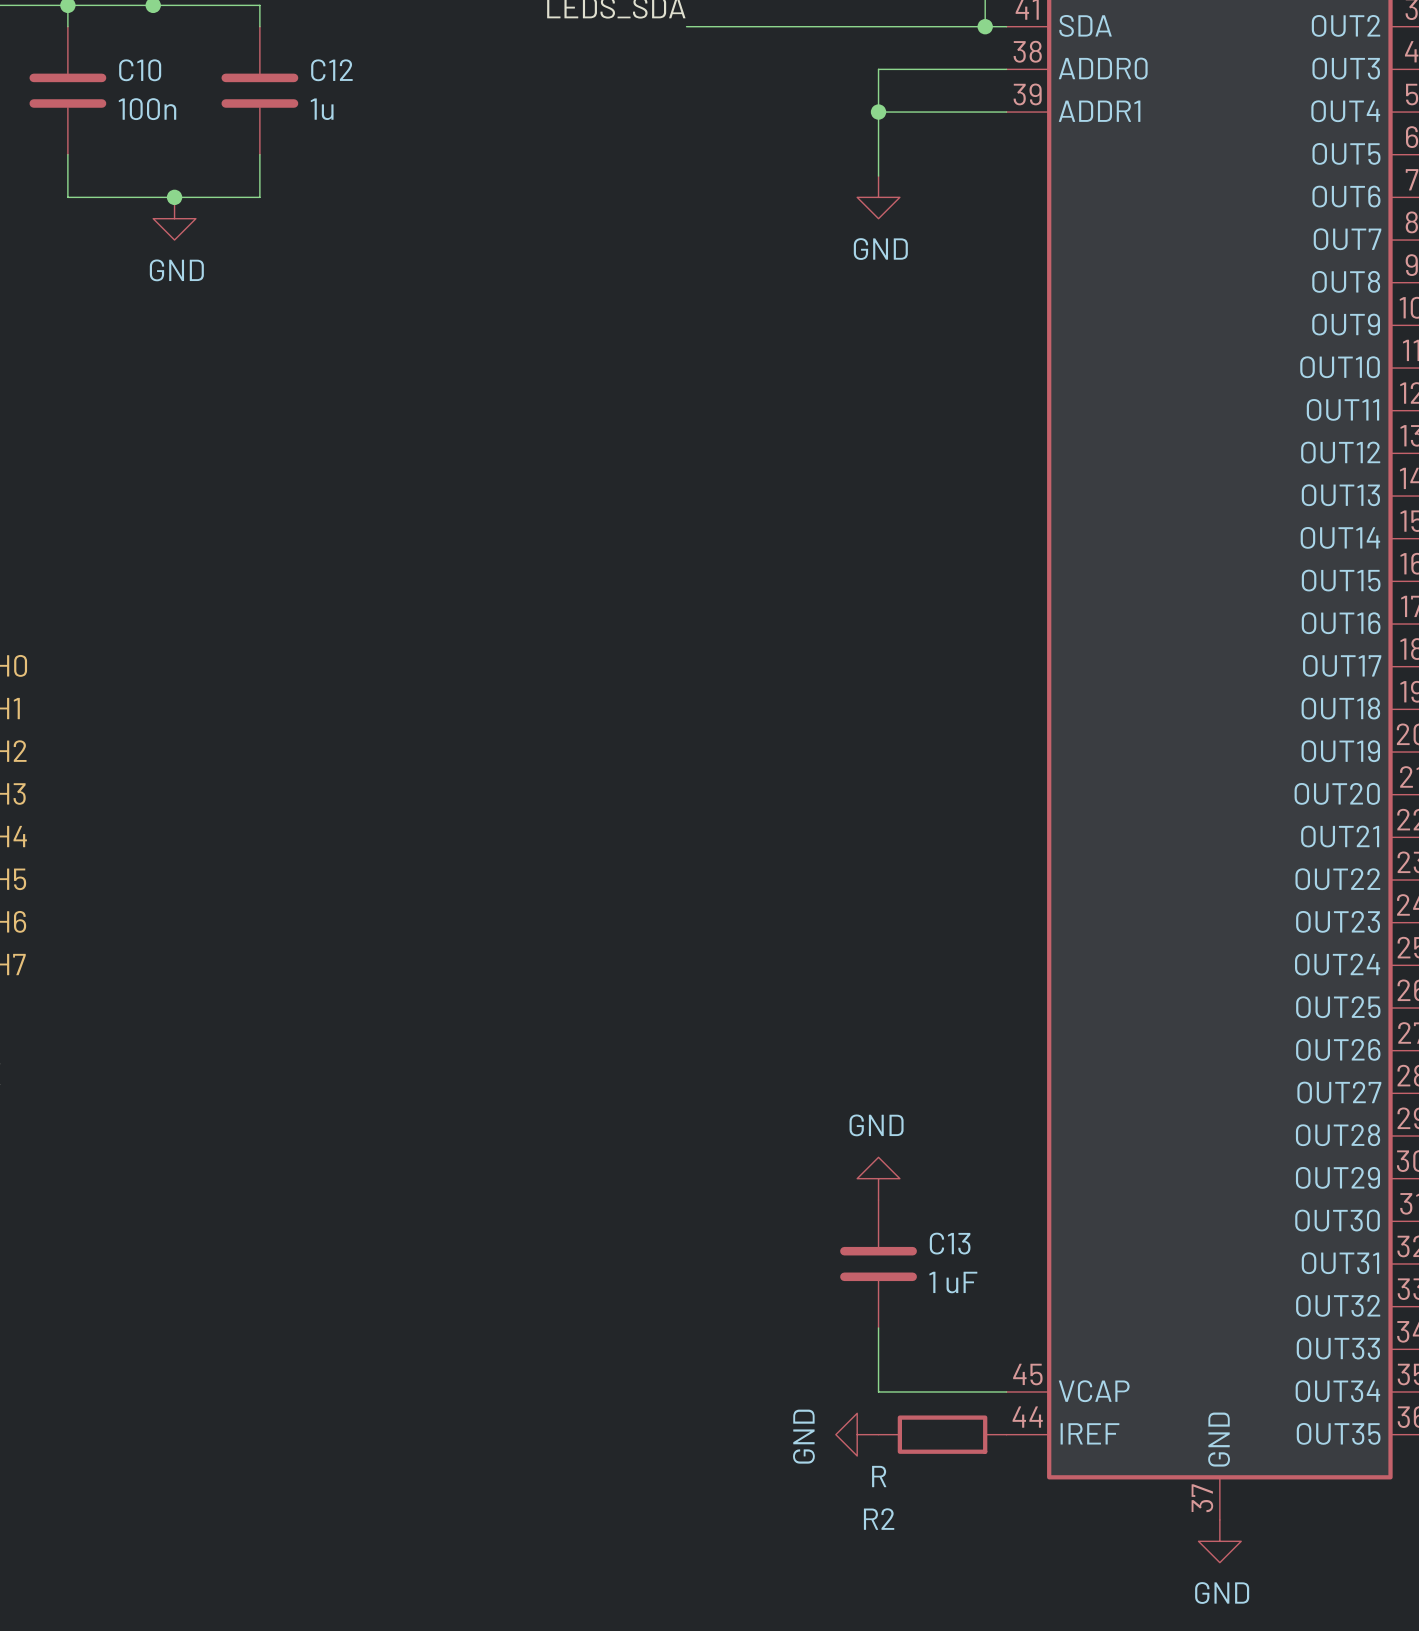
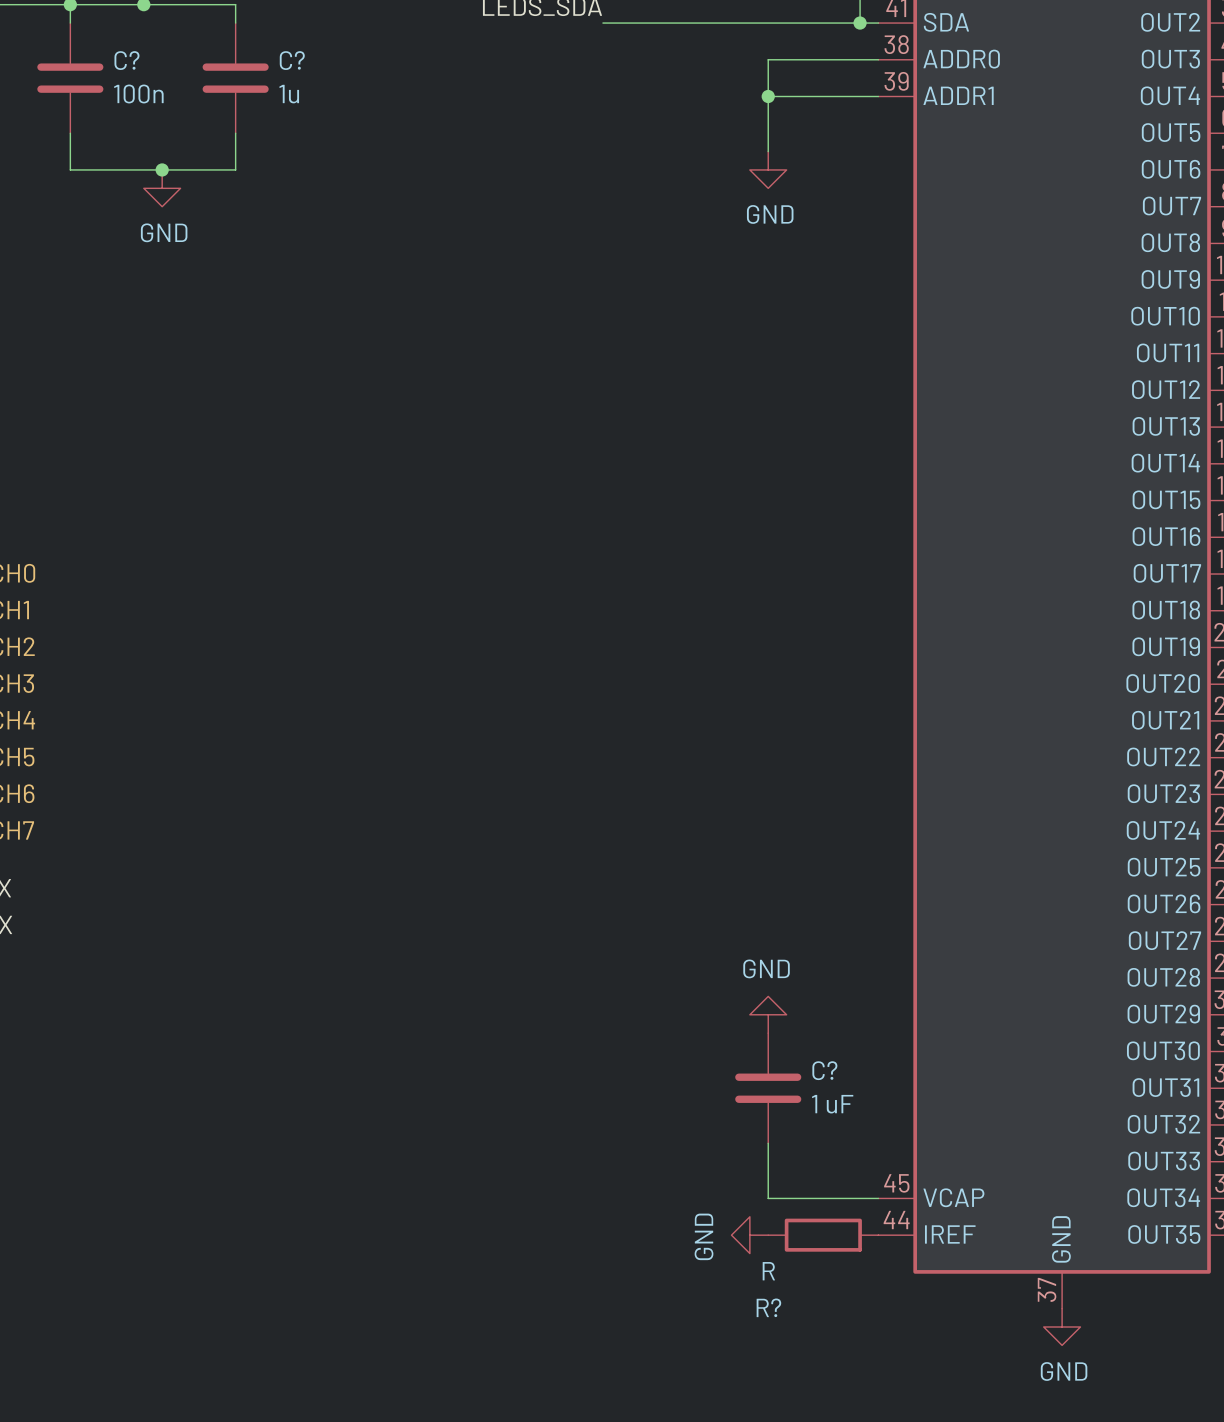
C10 name: C10 (140, 70) -> C? (126, 60)
C12 name: C12 (331, 70) -> C? (292, 60)
C13 name: C13 (950, 1243) -> C? (824, 1070)
R2 name: R2 (879, 1519) -> R? (768, 1307)

